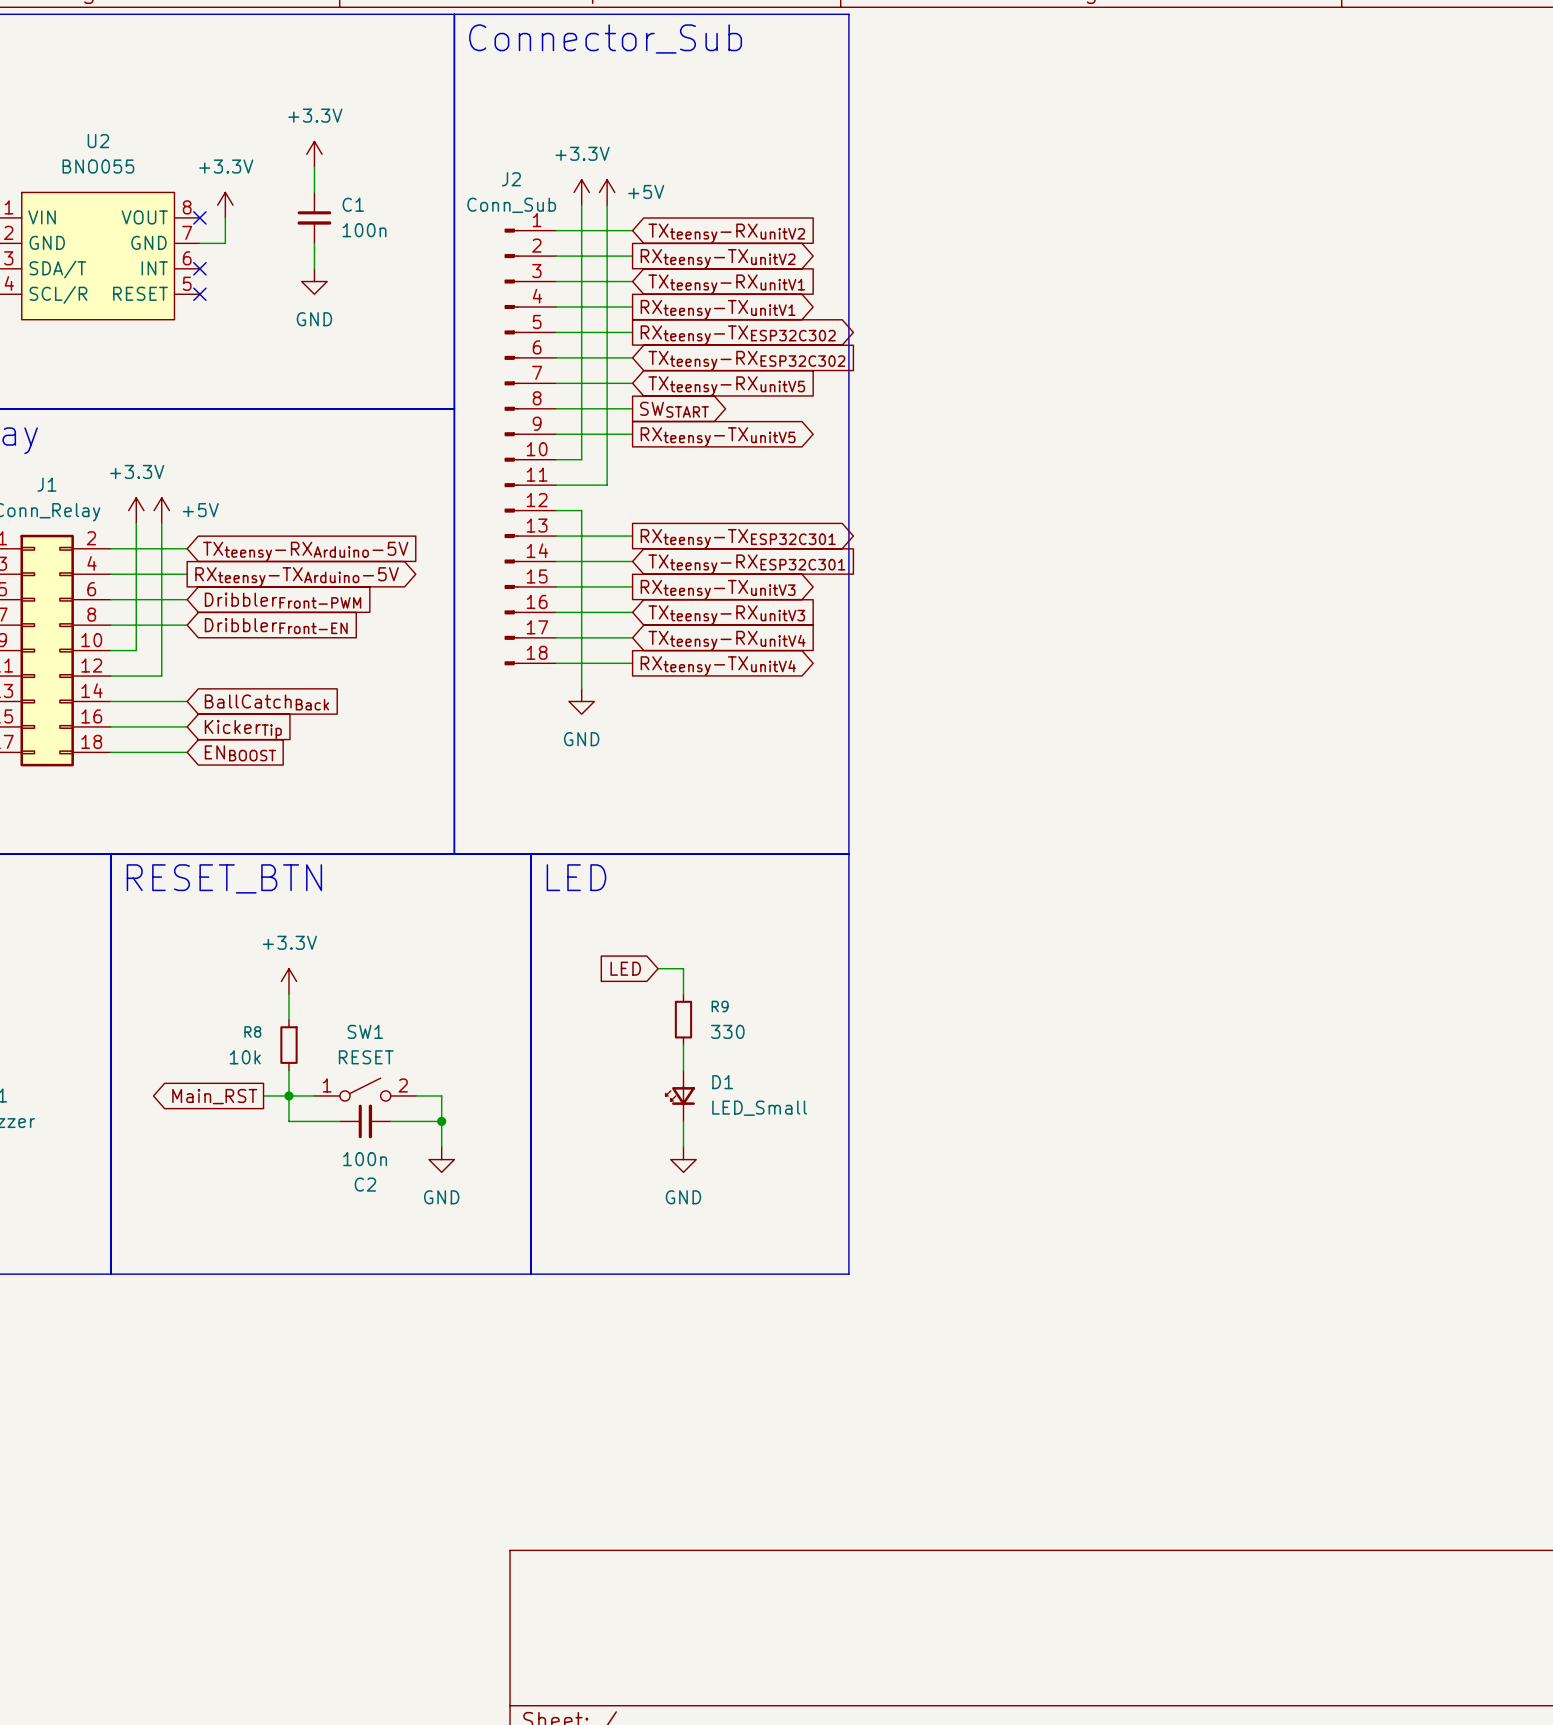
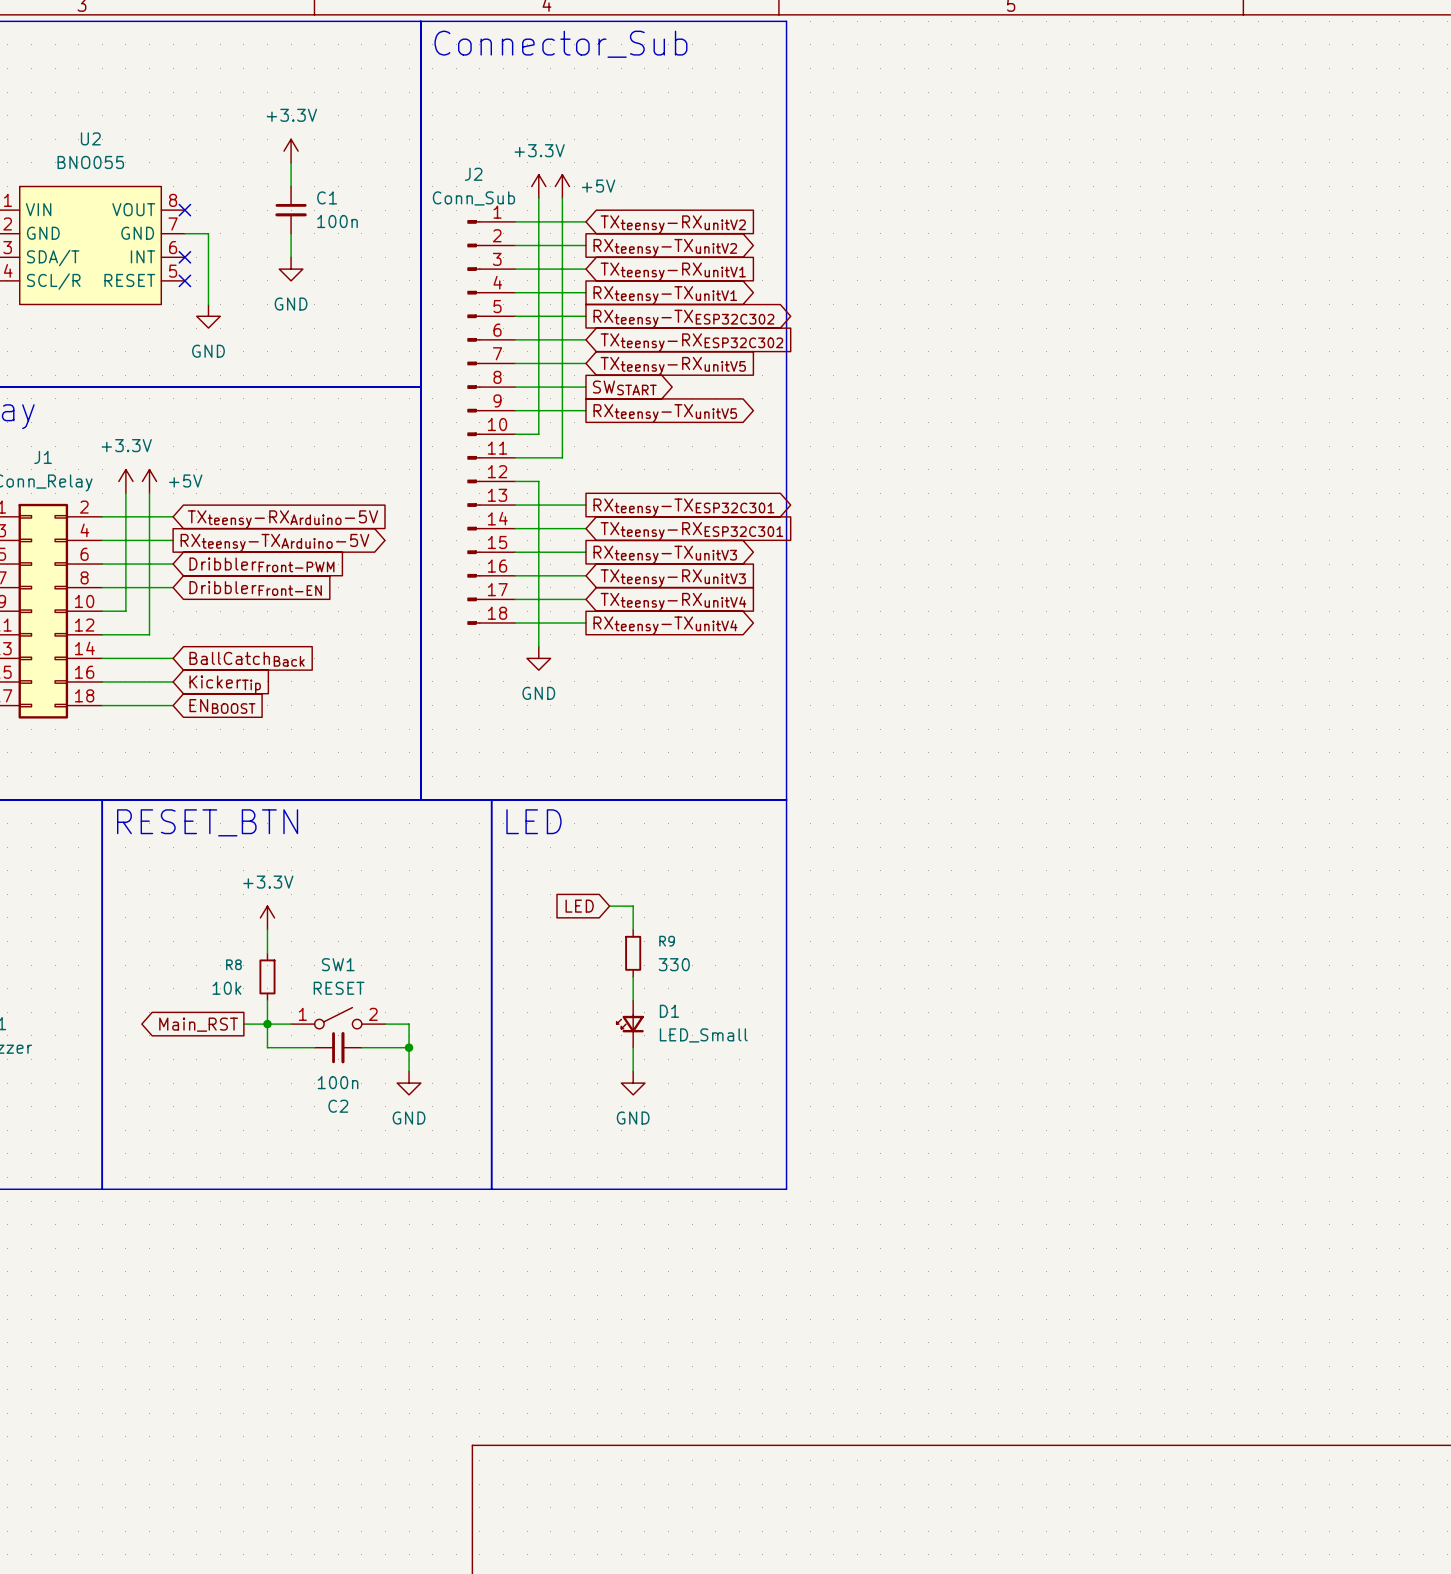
power symbol: +3.3V (225, 205) -> none
wire: (225, 217) (225, 243) -> (208, 304) (208, 233)
power symbol: none -> GND (208, 316)

